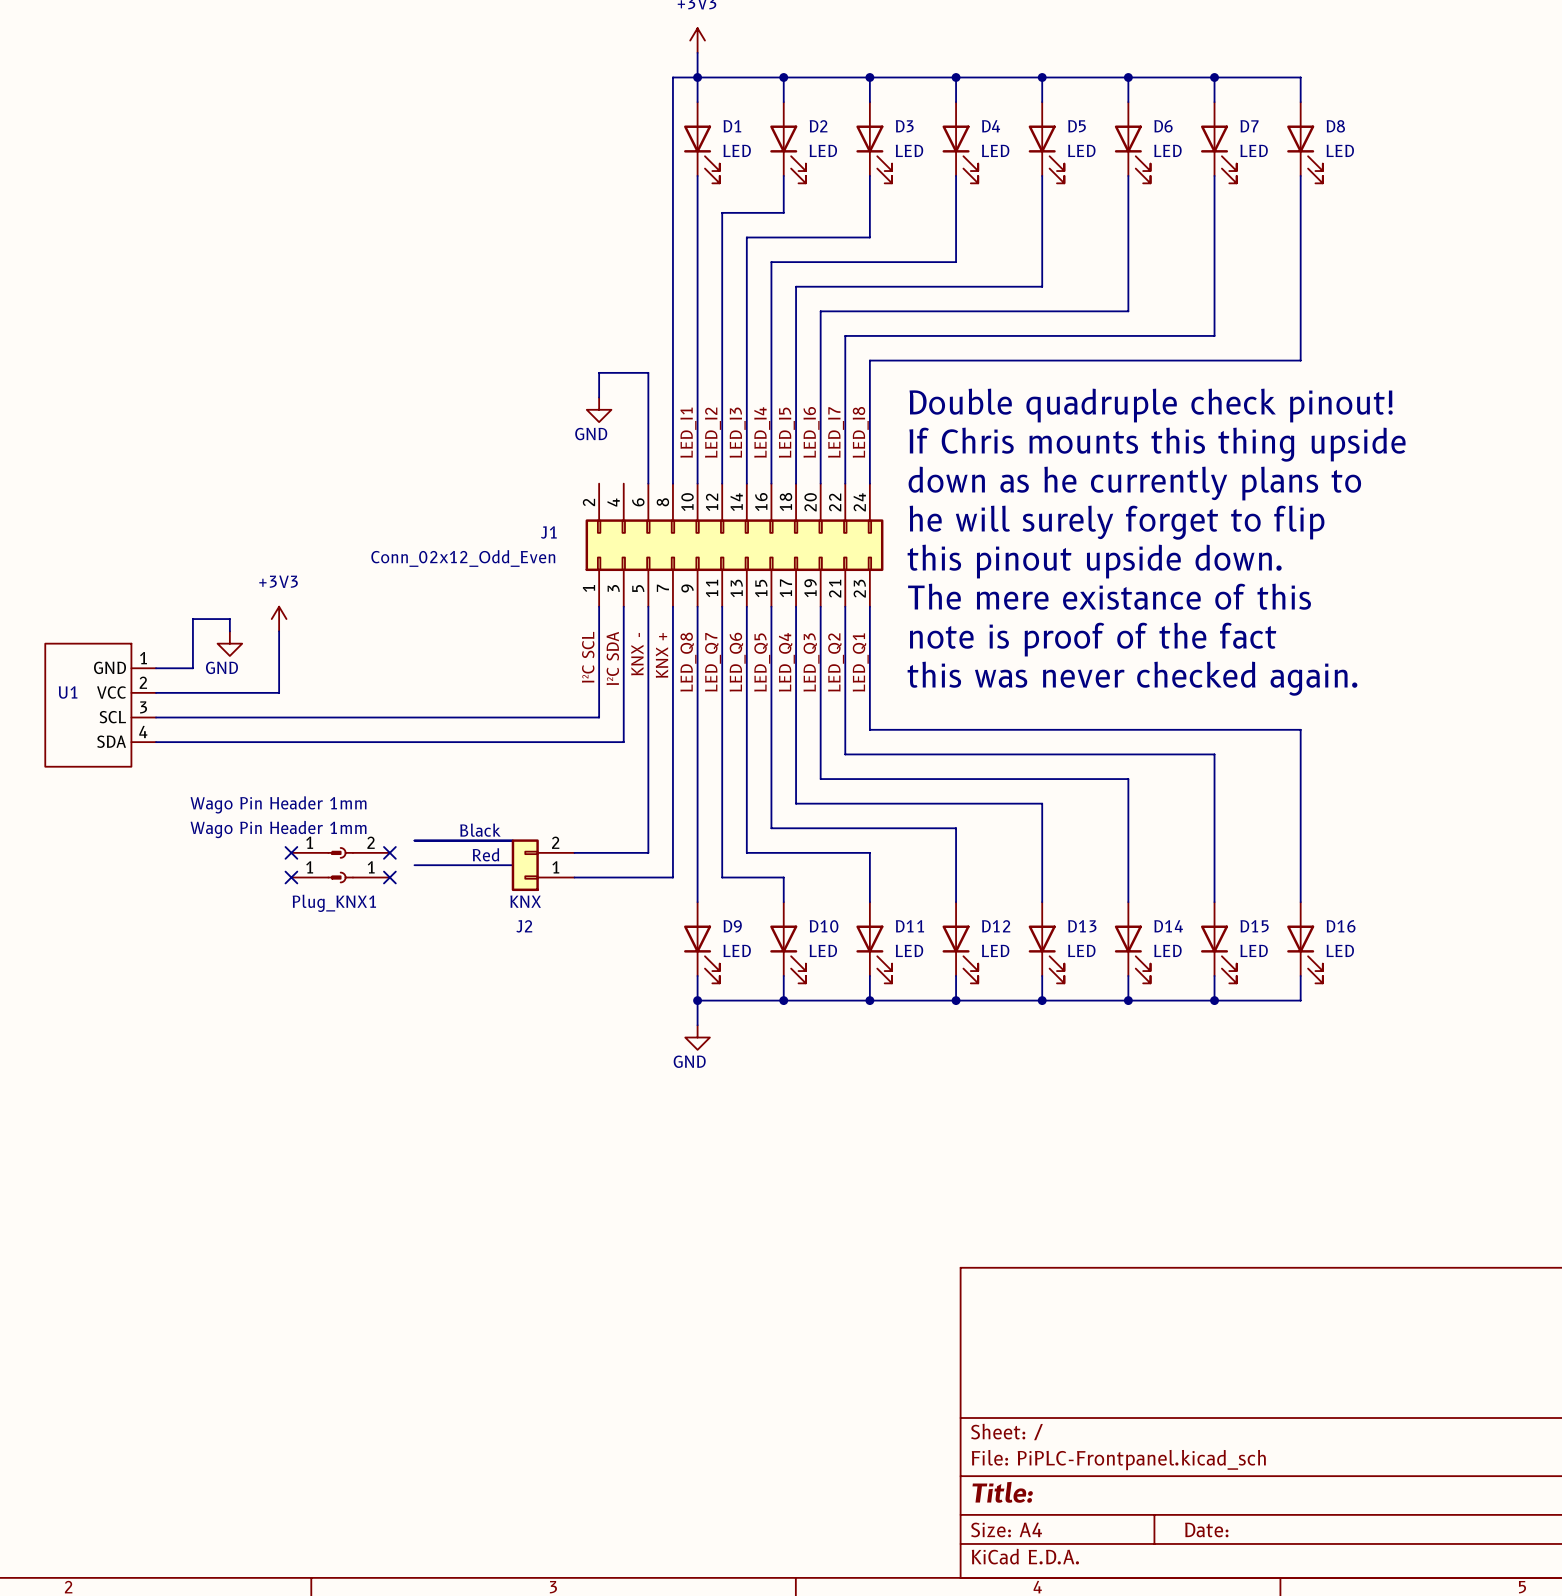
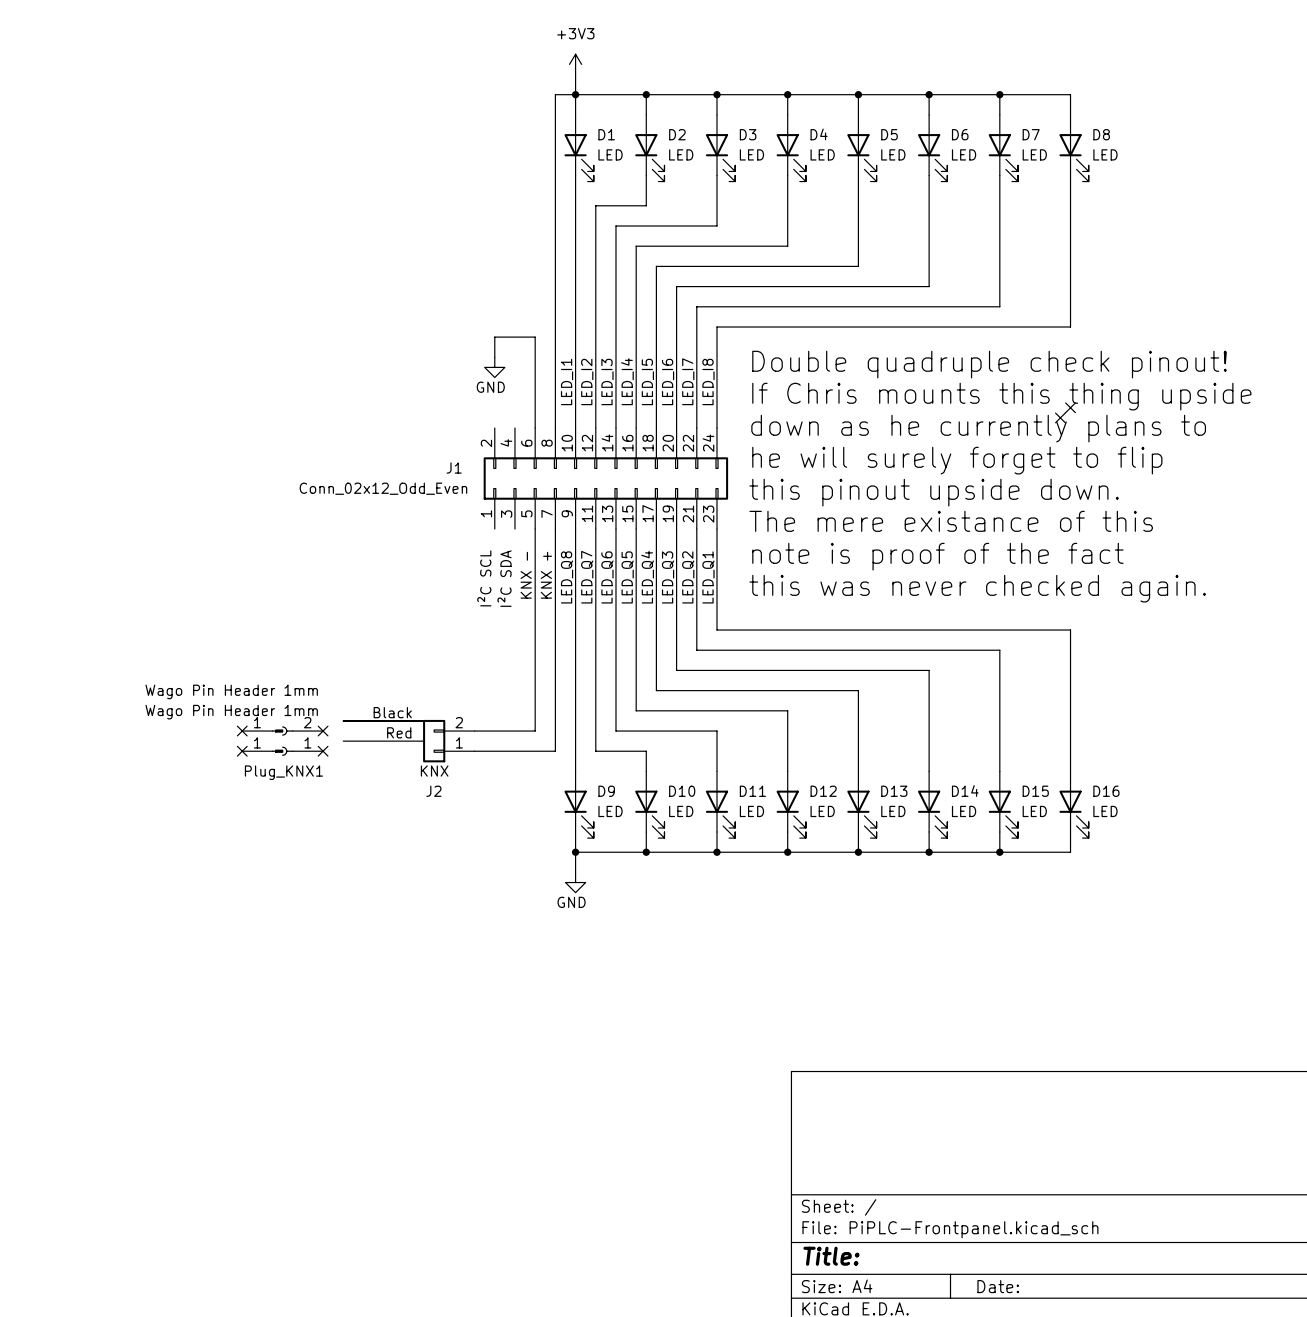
no-connect mark: none -> (1070, 407)
no-connect mark: none -> (1060, 417)
wire: (599, 606) (599, 717) (156, 717) -> none
wire: (623, 606) (623, 742) (156, 742) -> none
power symbol: +3V3 (279, 619) -> none
wire: (229, 631) (229, 619) (192, 619) (192, 668) (156, 668) -> none
wire: (279, 631) (279, 692) (156, 692) -> none
power symbol: GND (229, 643) -> none
U1: (100, 705) -> none

